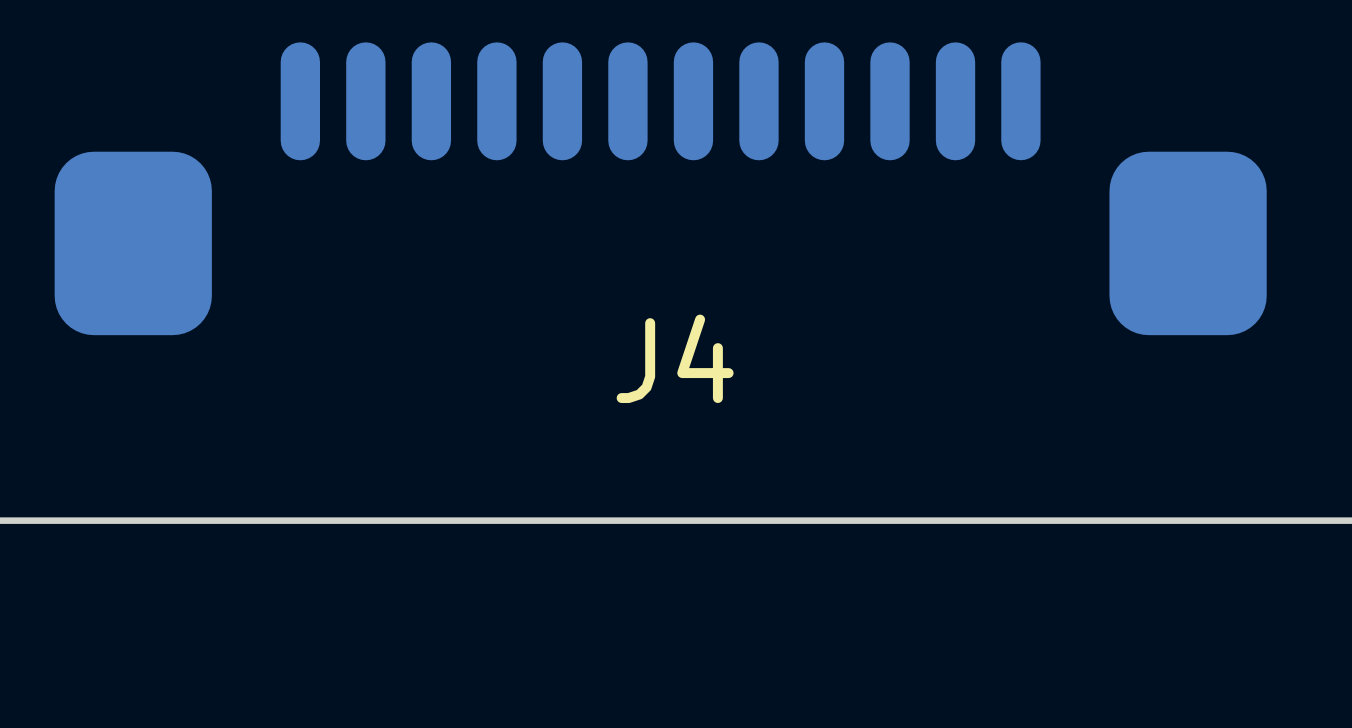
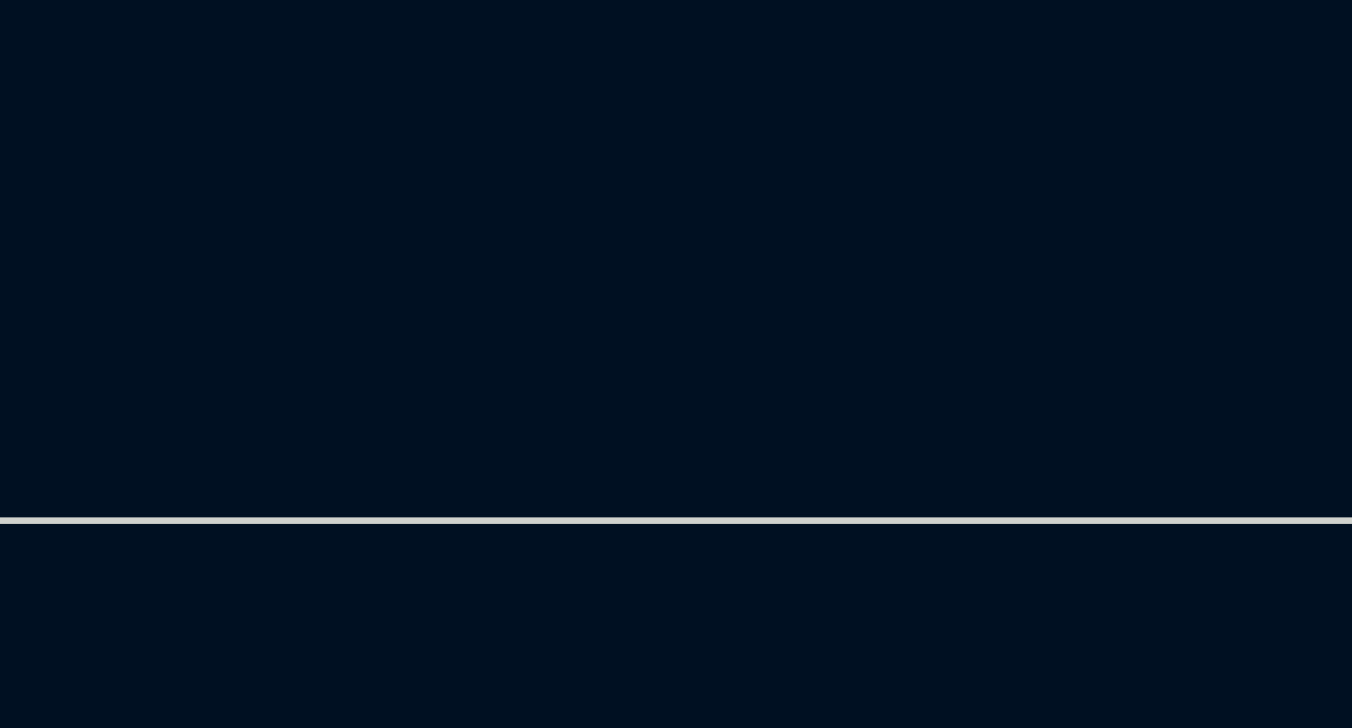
J4: (660, 188) -> none

